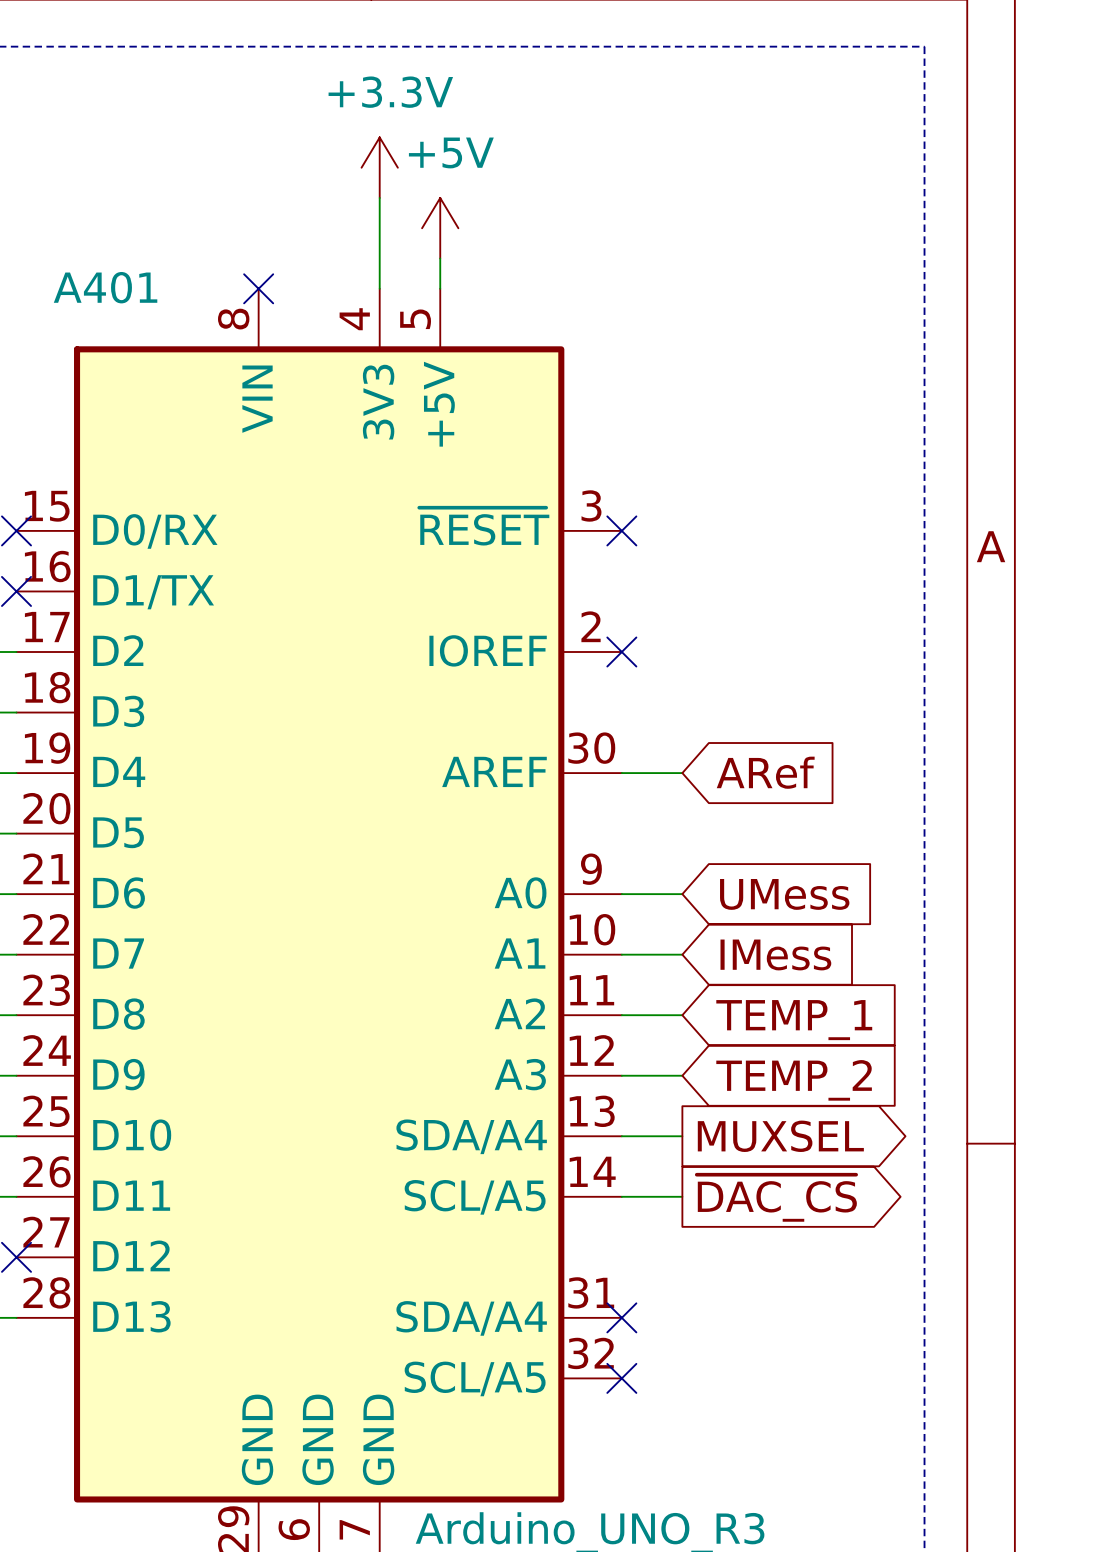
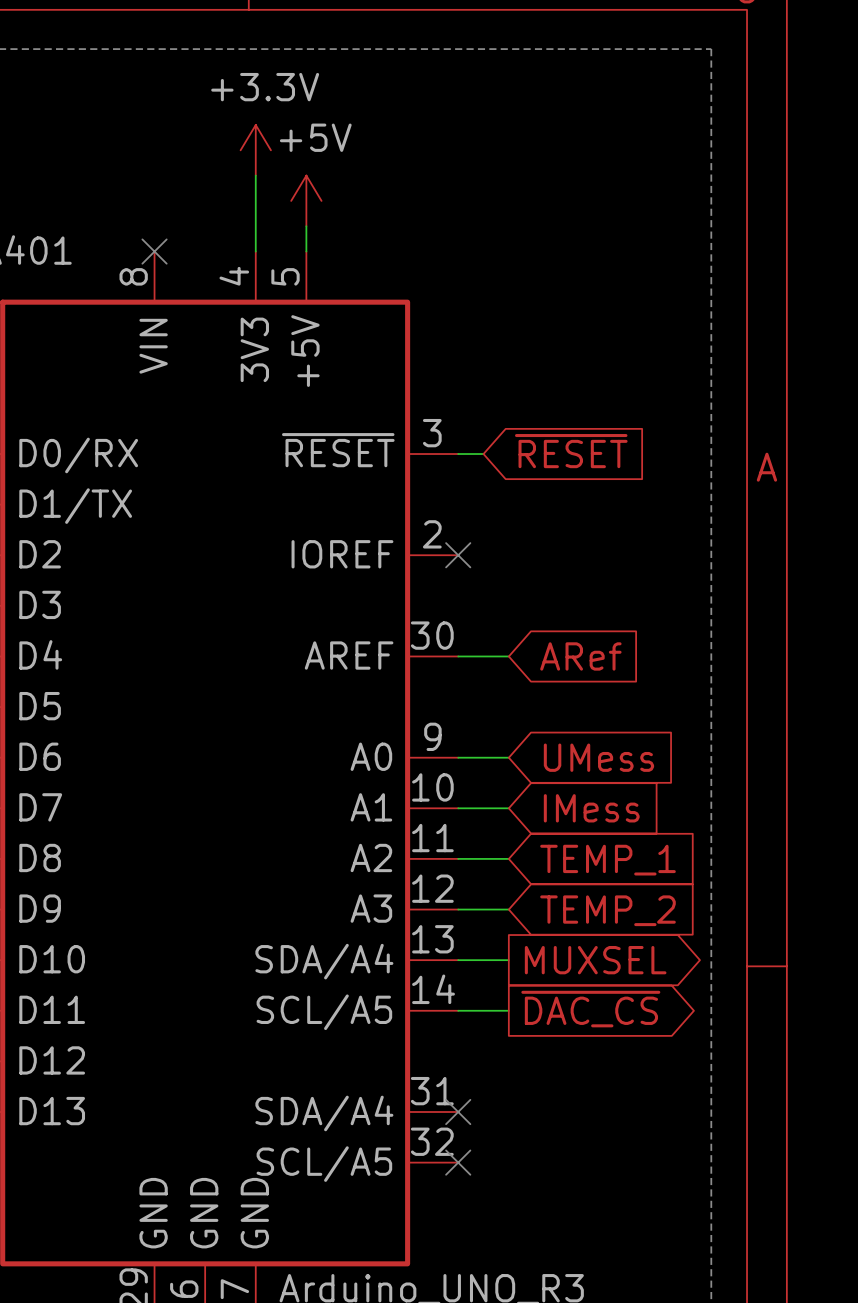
global label: none -> ~{RESET} (571, 451)
wire: none -> (458, 454) (483, 454)
no-connect mark: (621, 530) -> none

